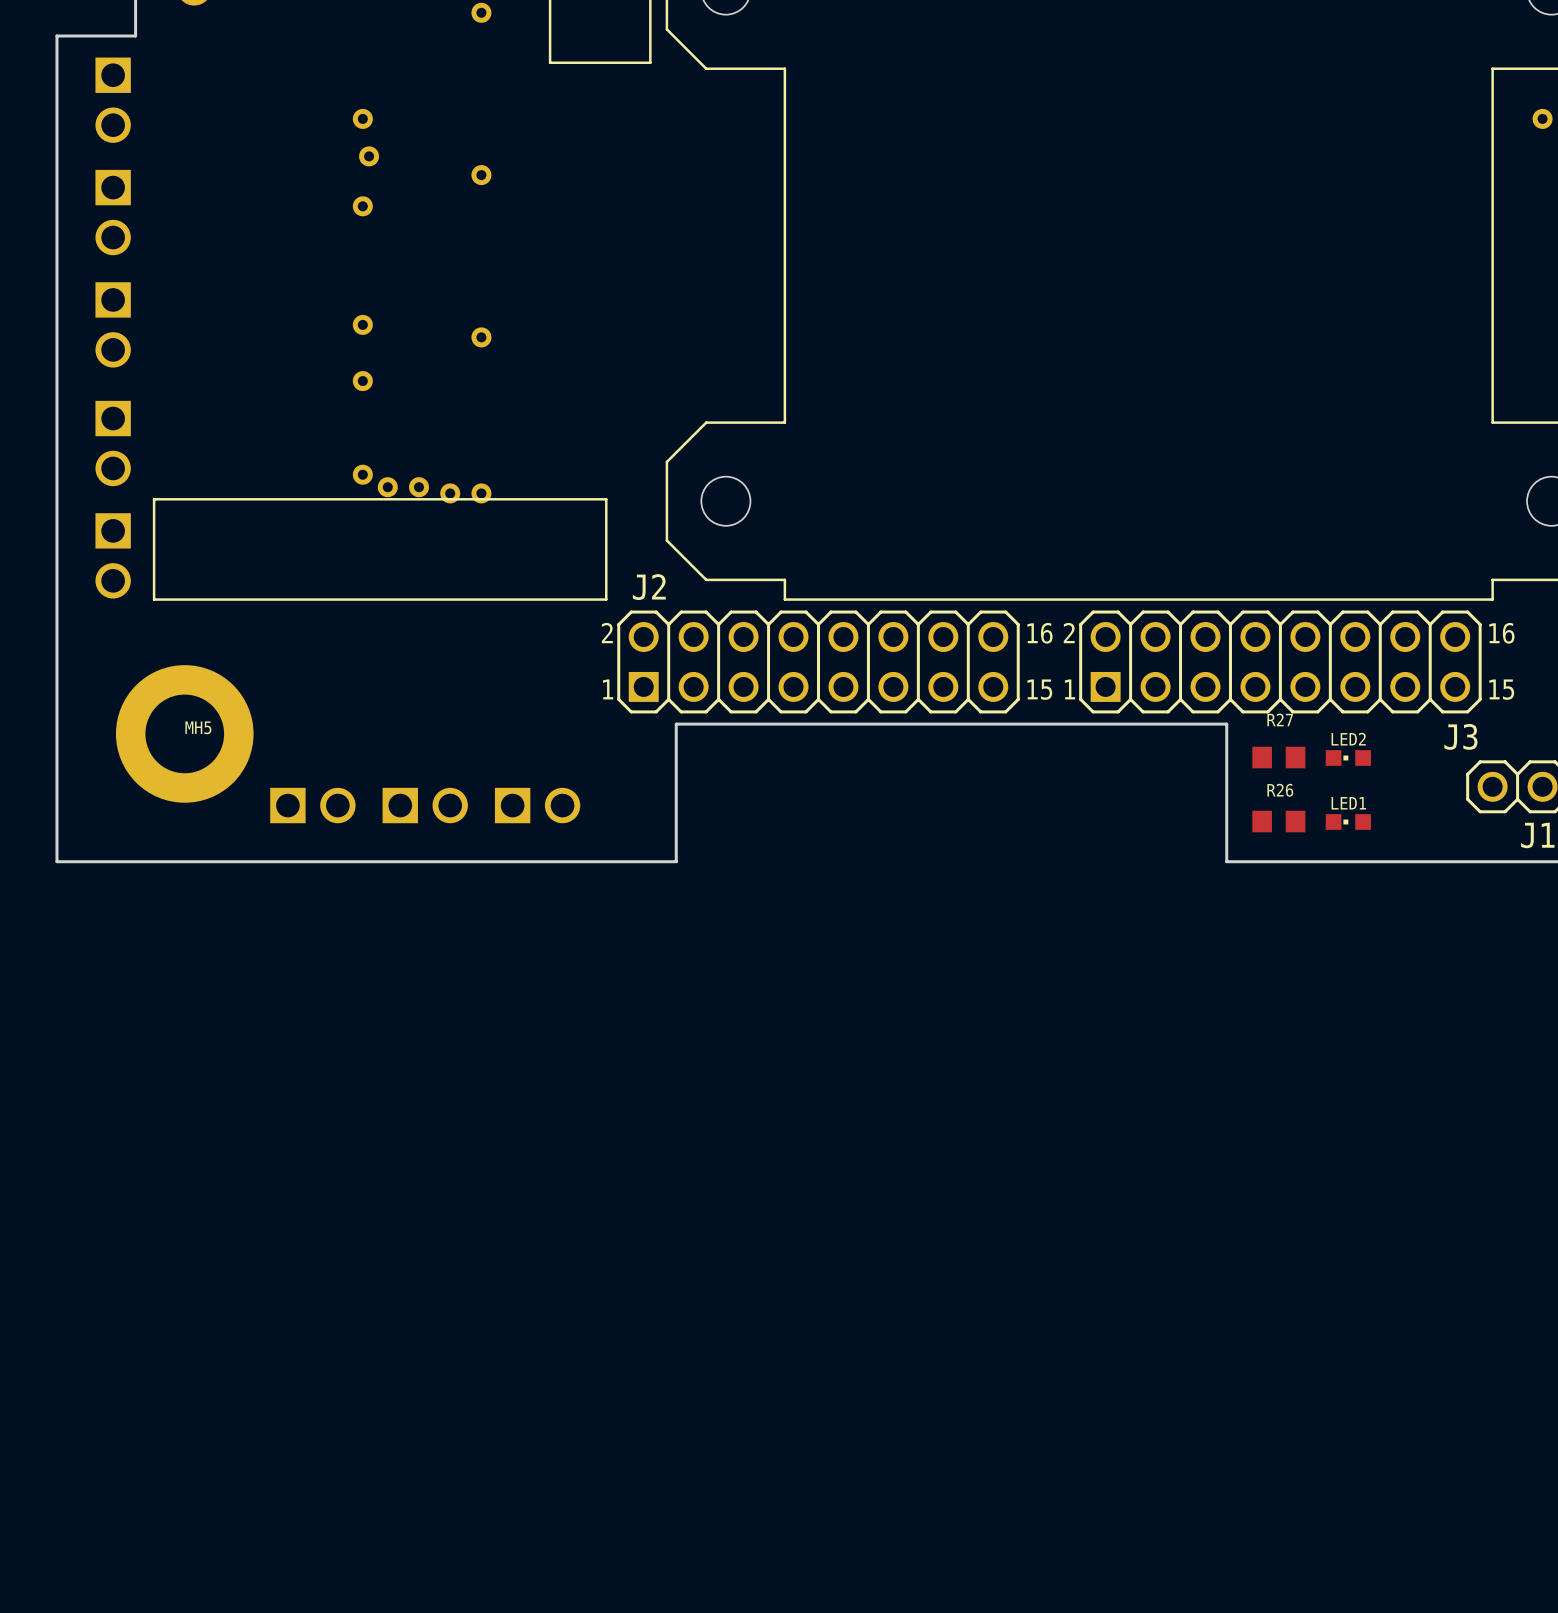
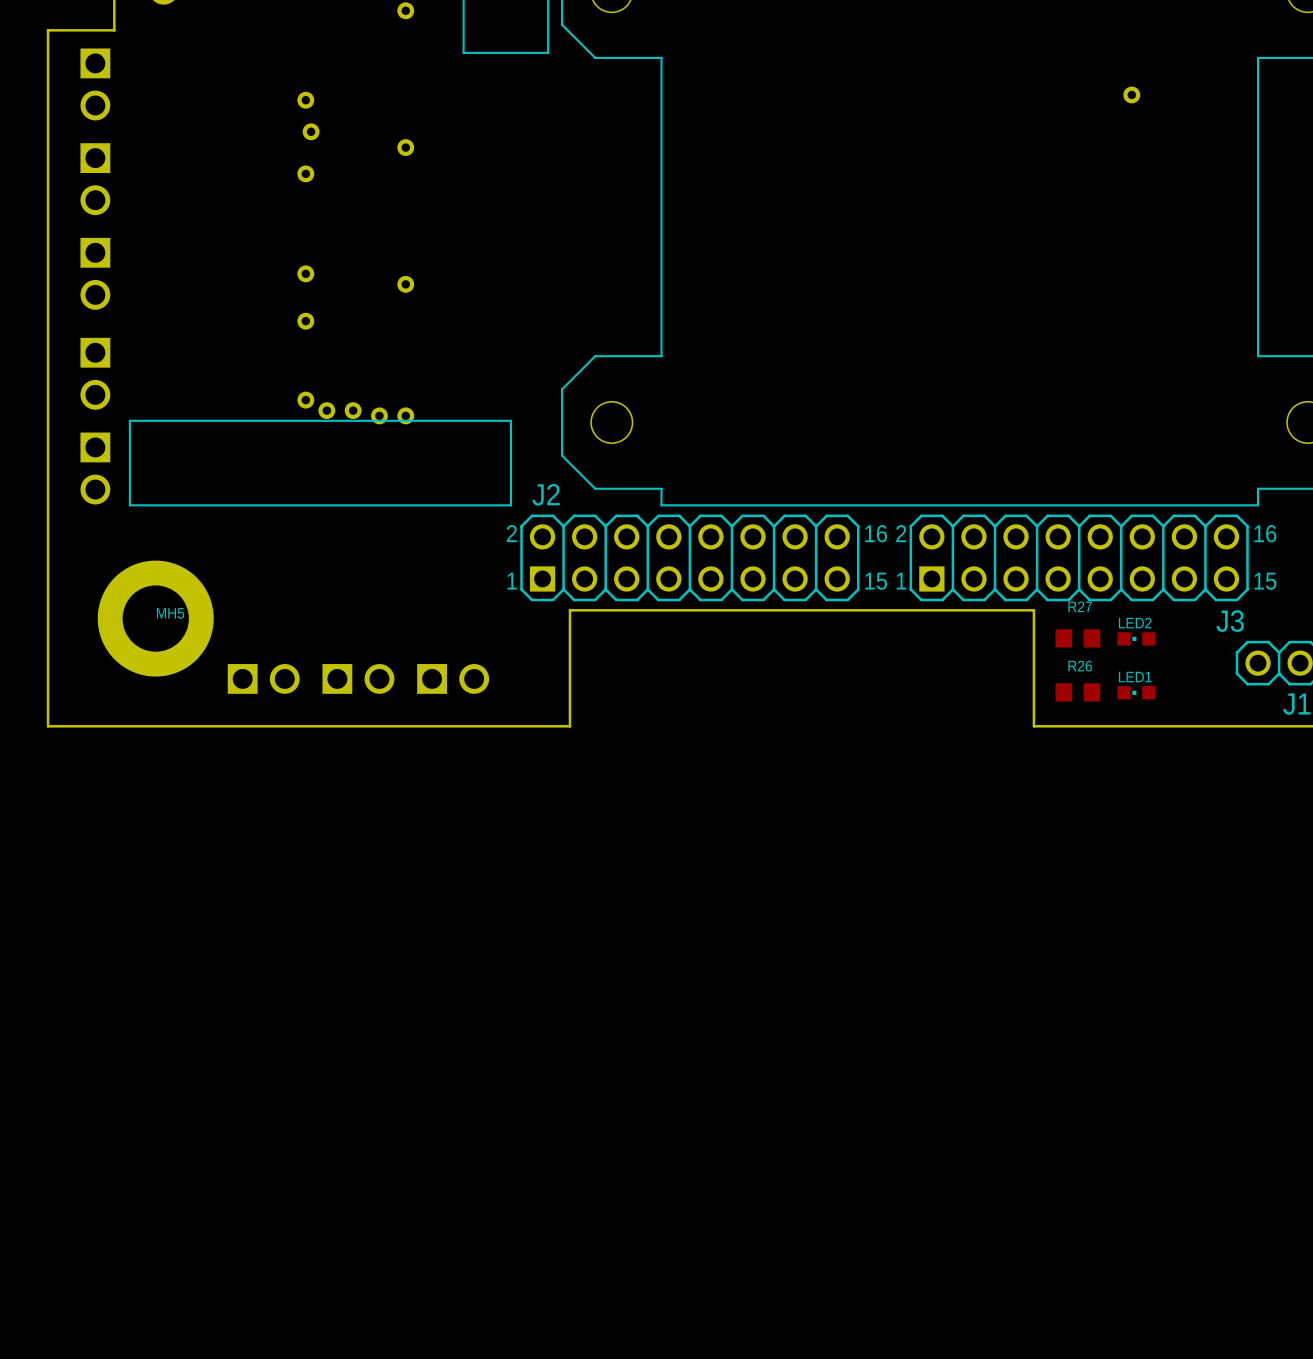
part position: (1542, 118) -> (1131, 94)

